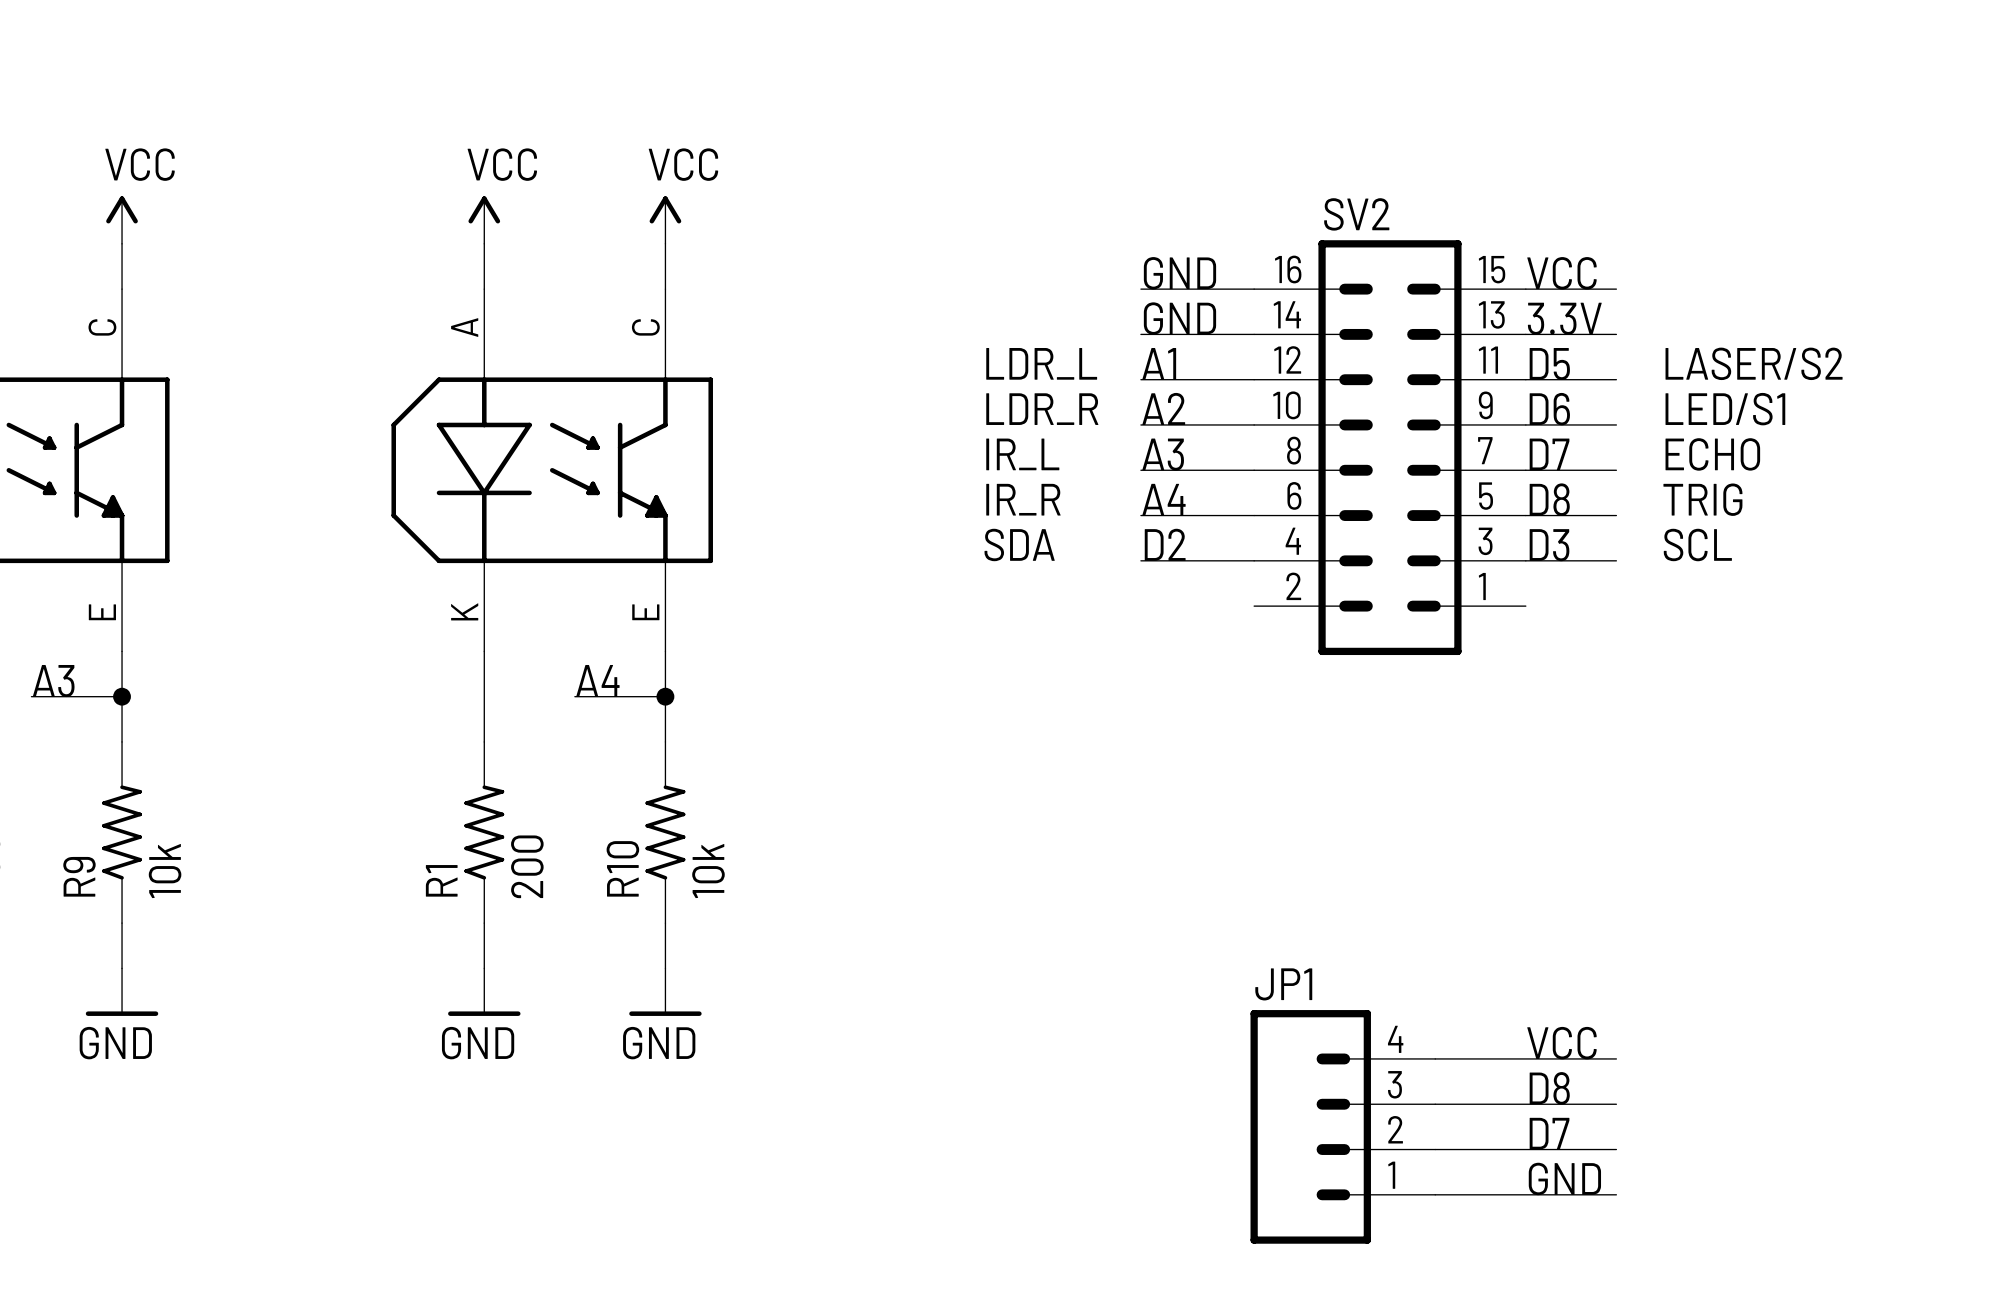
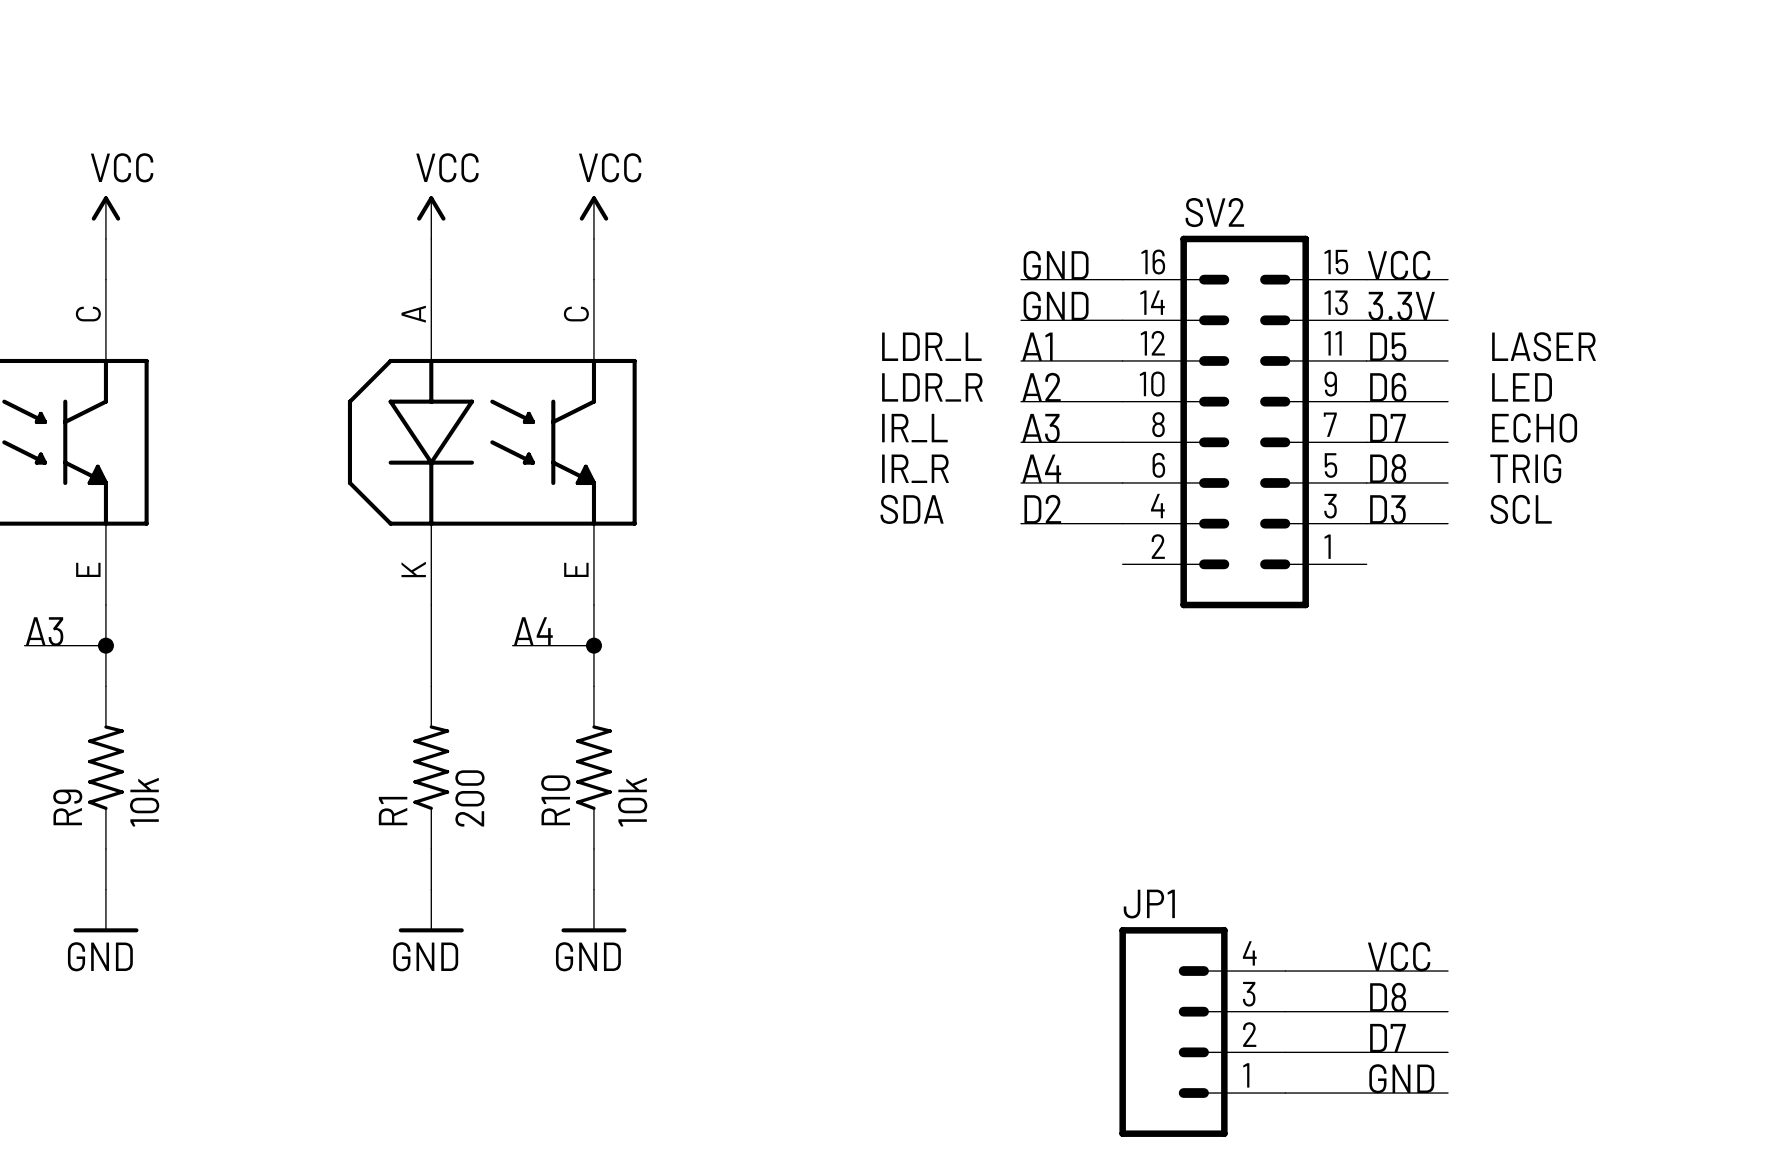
text: LASER/S2 (1754, 363) -> LASER (1543, 346)
text: LED/S1 (1725, 409) -> LED (1522, 387)

